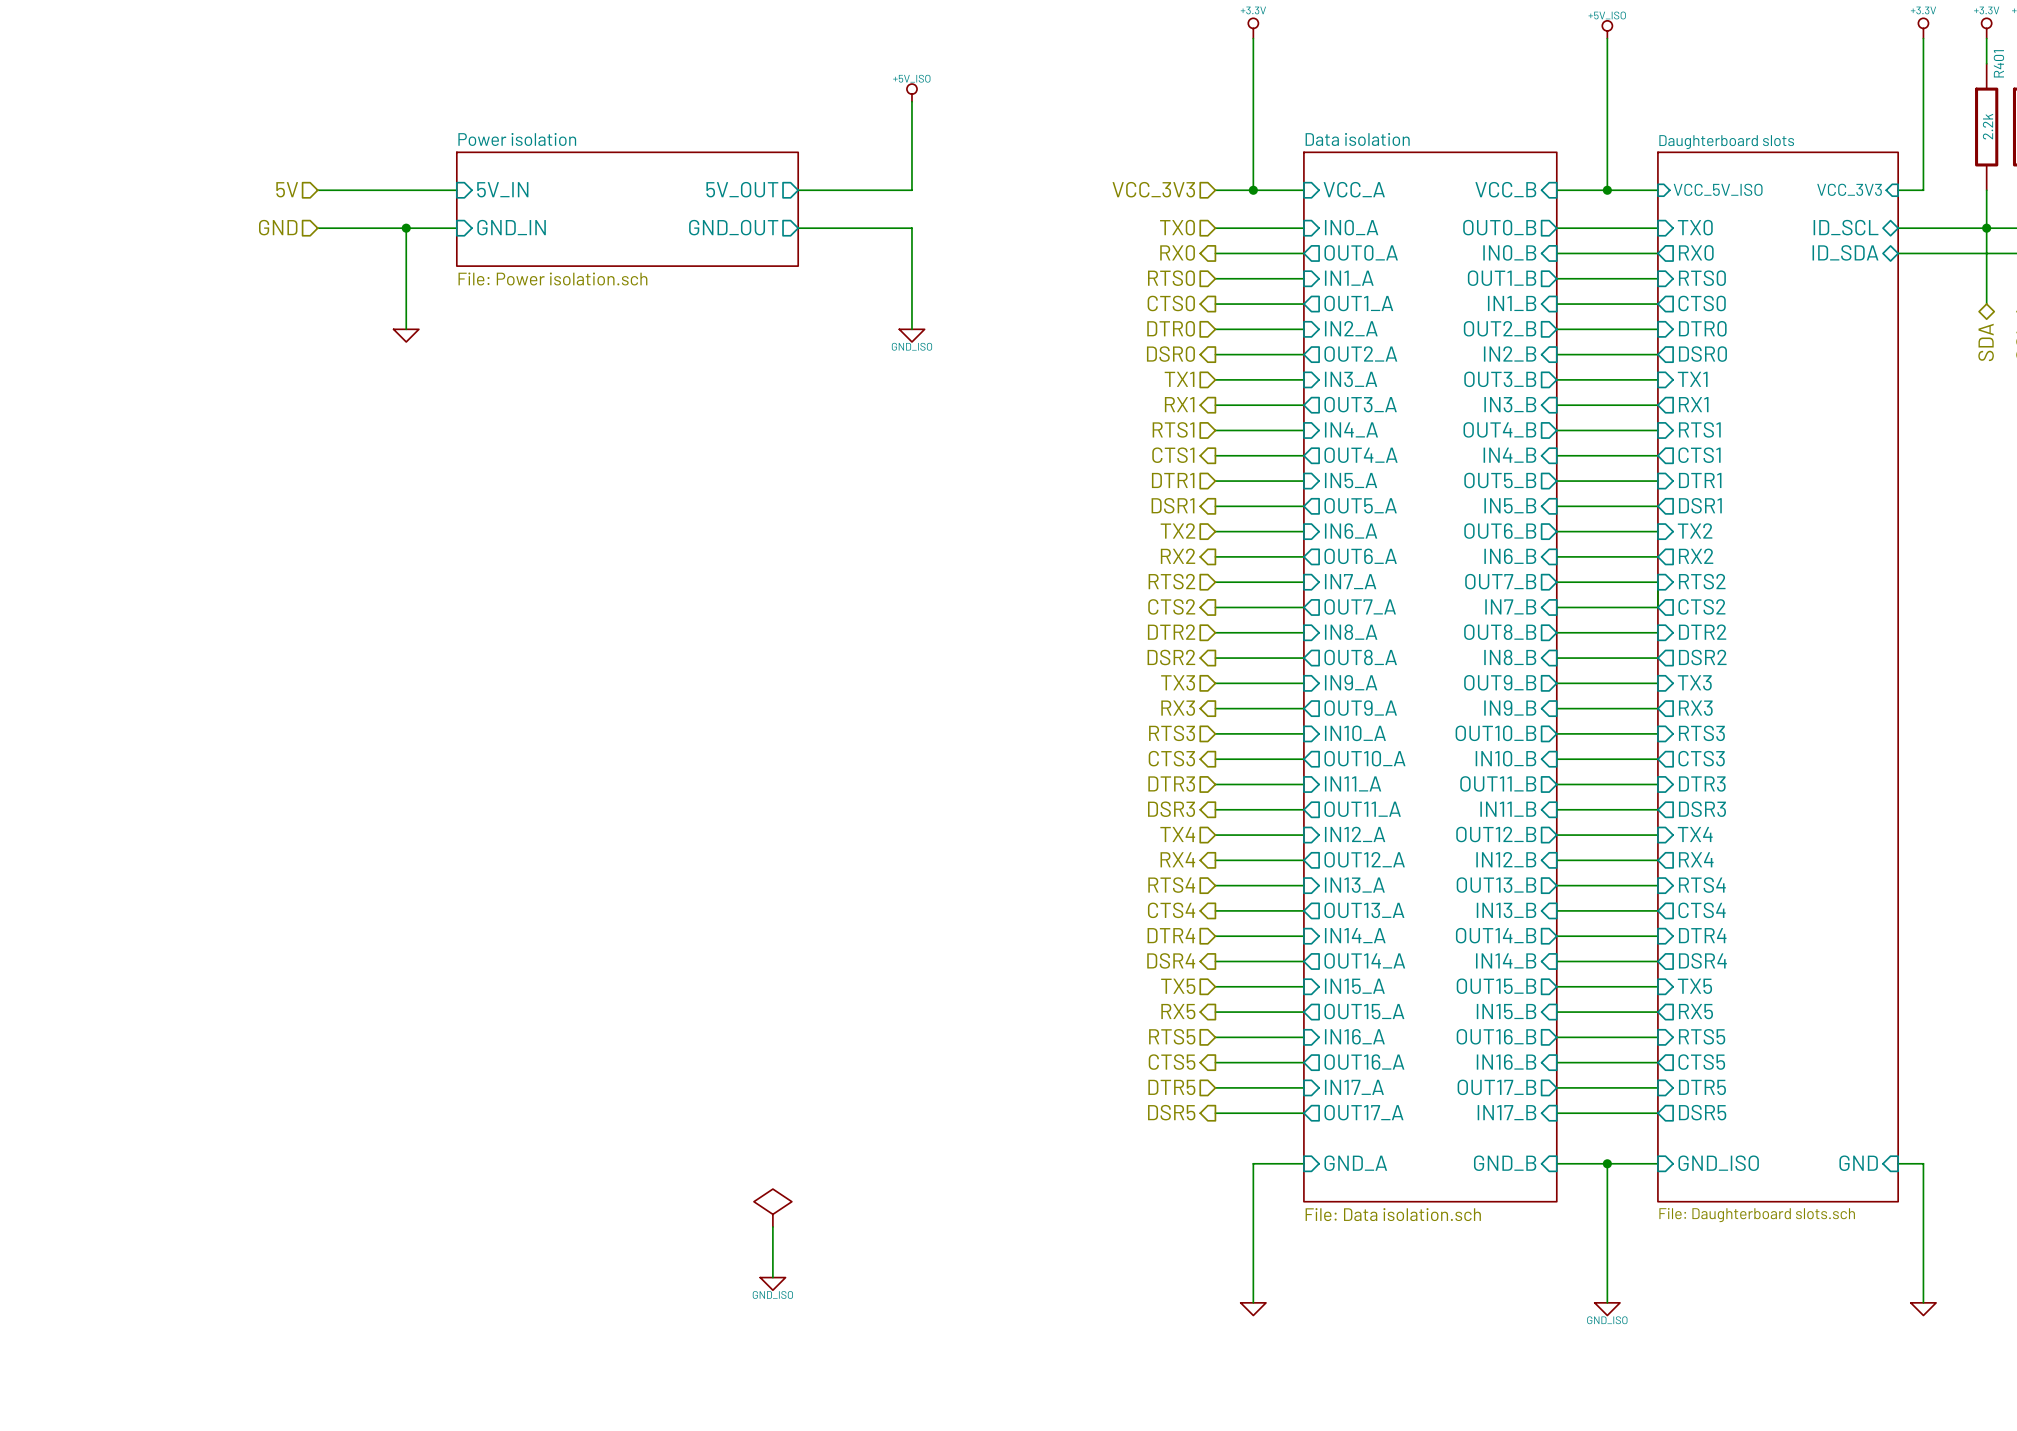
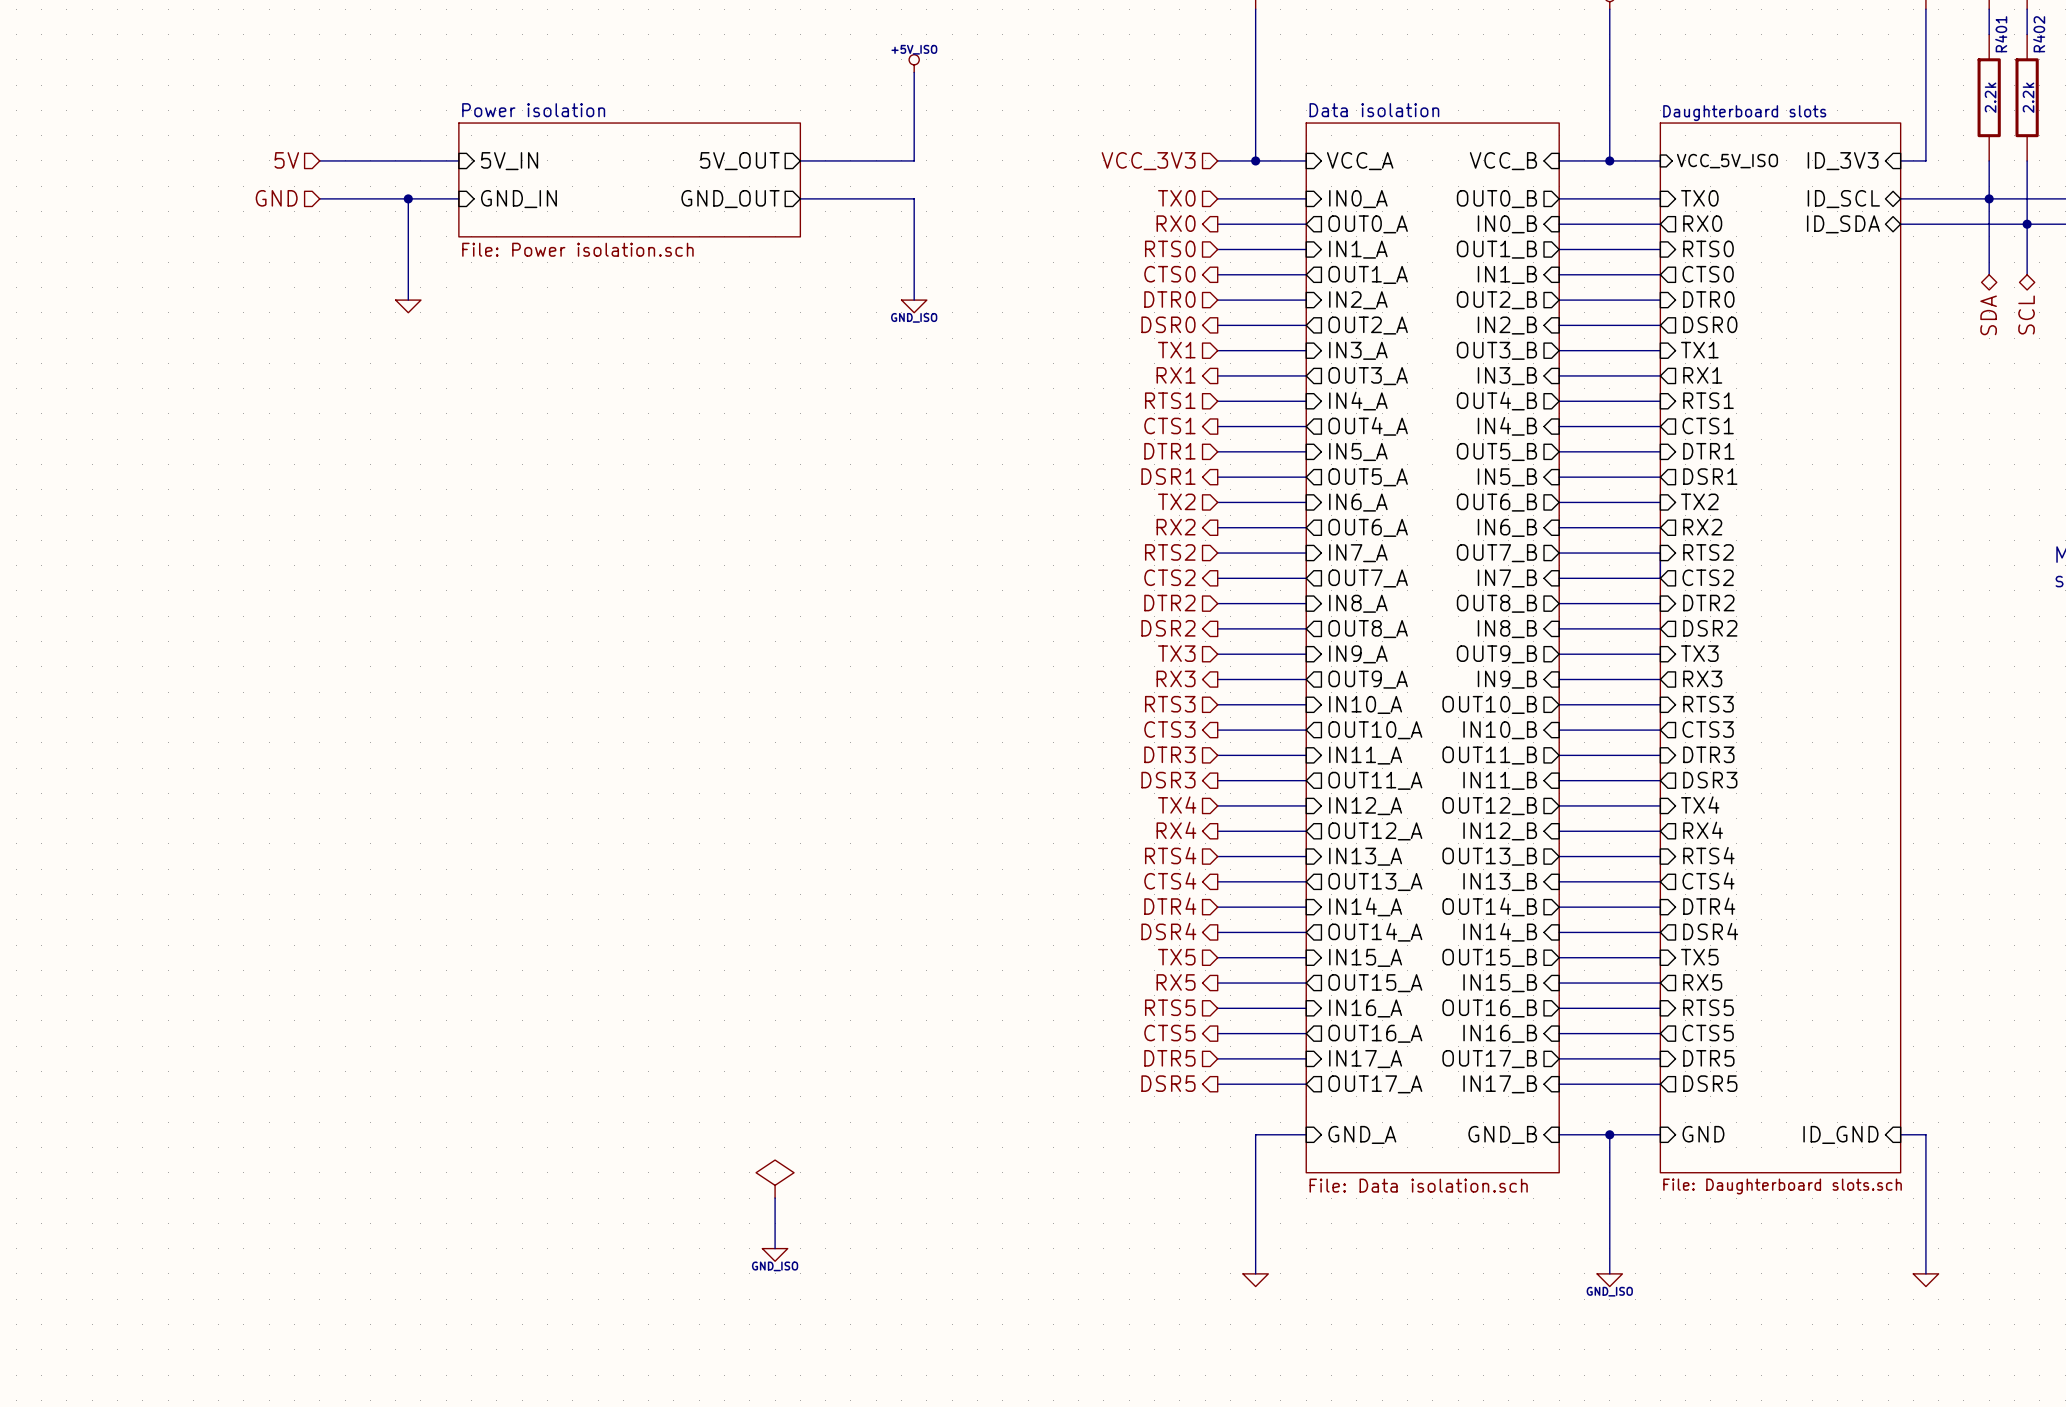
sheet pin: VCC_3V3 (1849, 189) -> ID_3V3 (1843, 161)
sheet pin: GND_ISO (1718, 1163) -> GND (1703, 1134)
sheet pin: GND (1858, 1163) -> ID_GND (1840, 1134)

